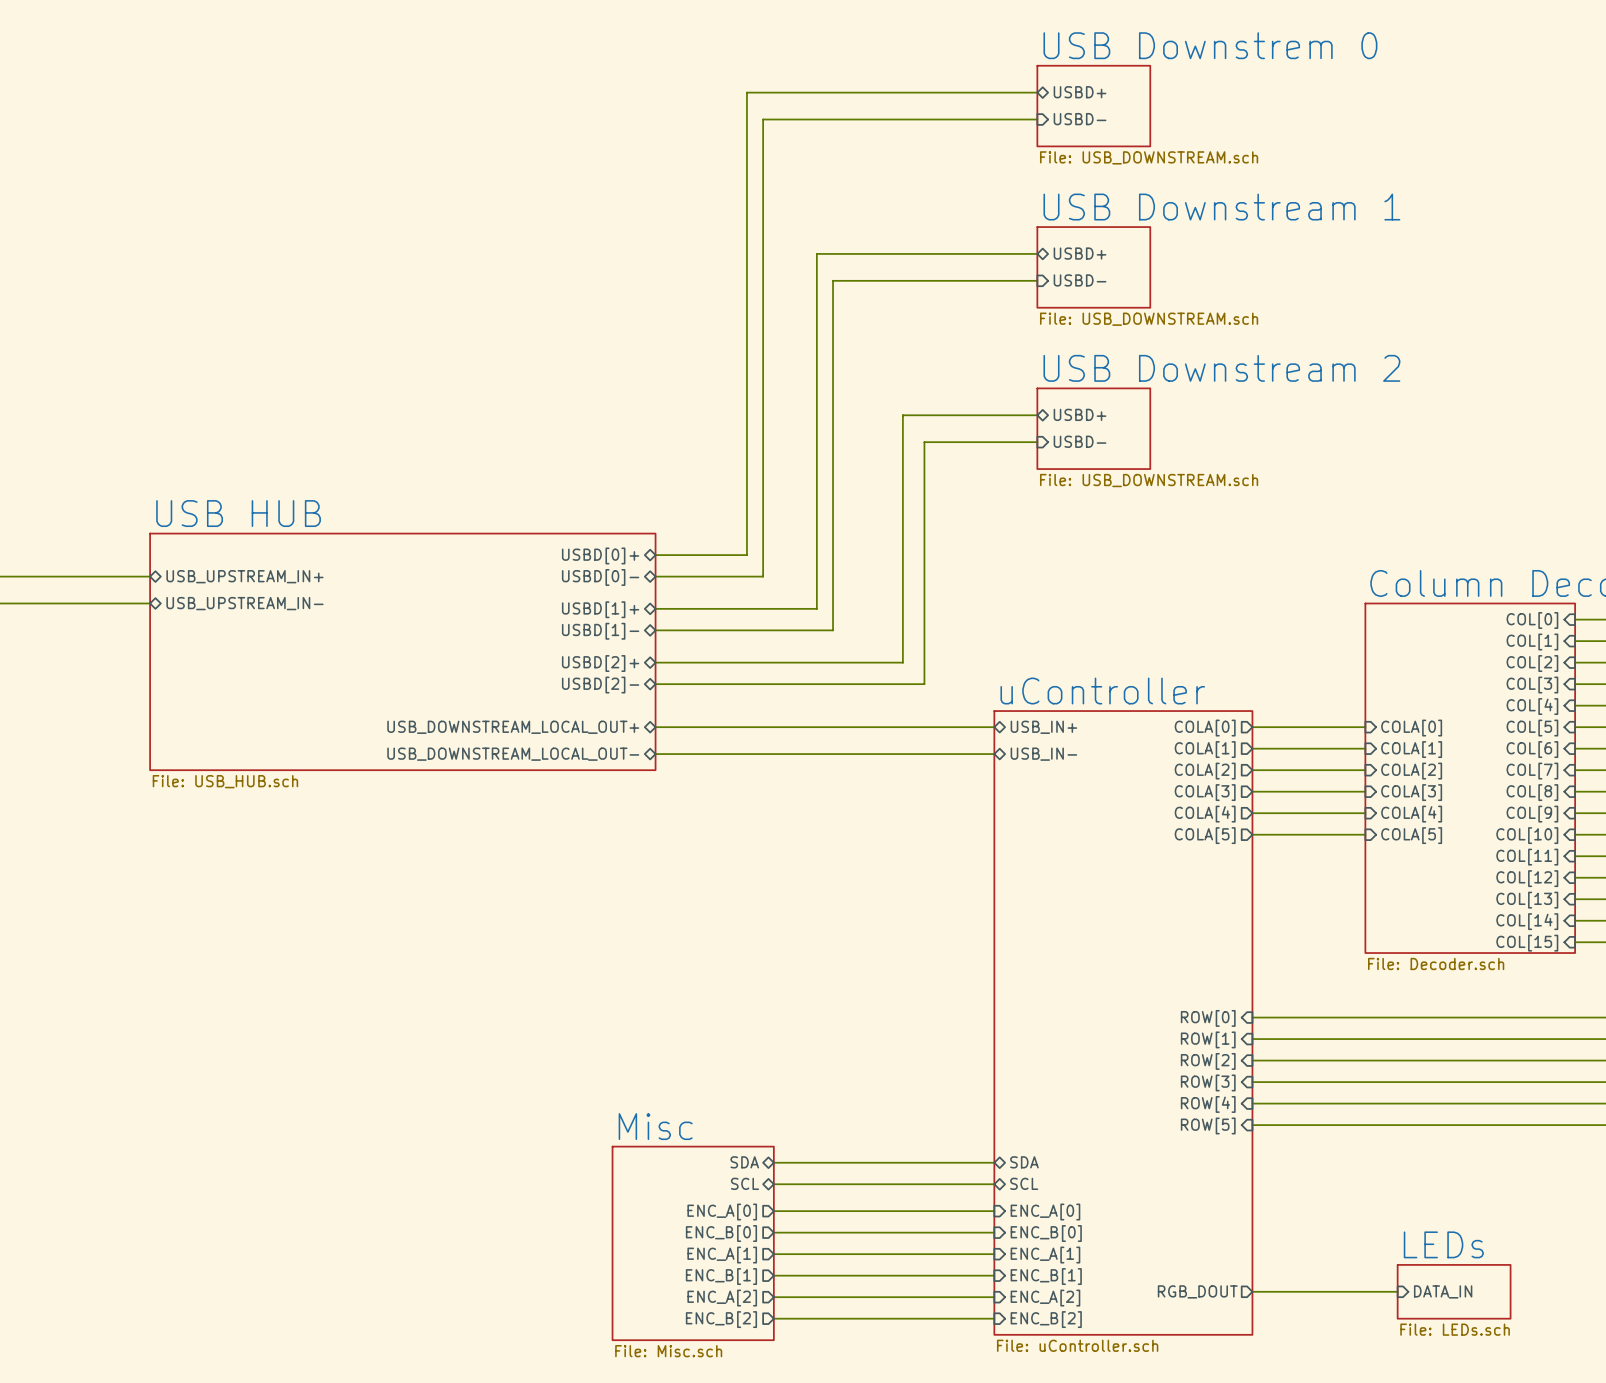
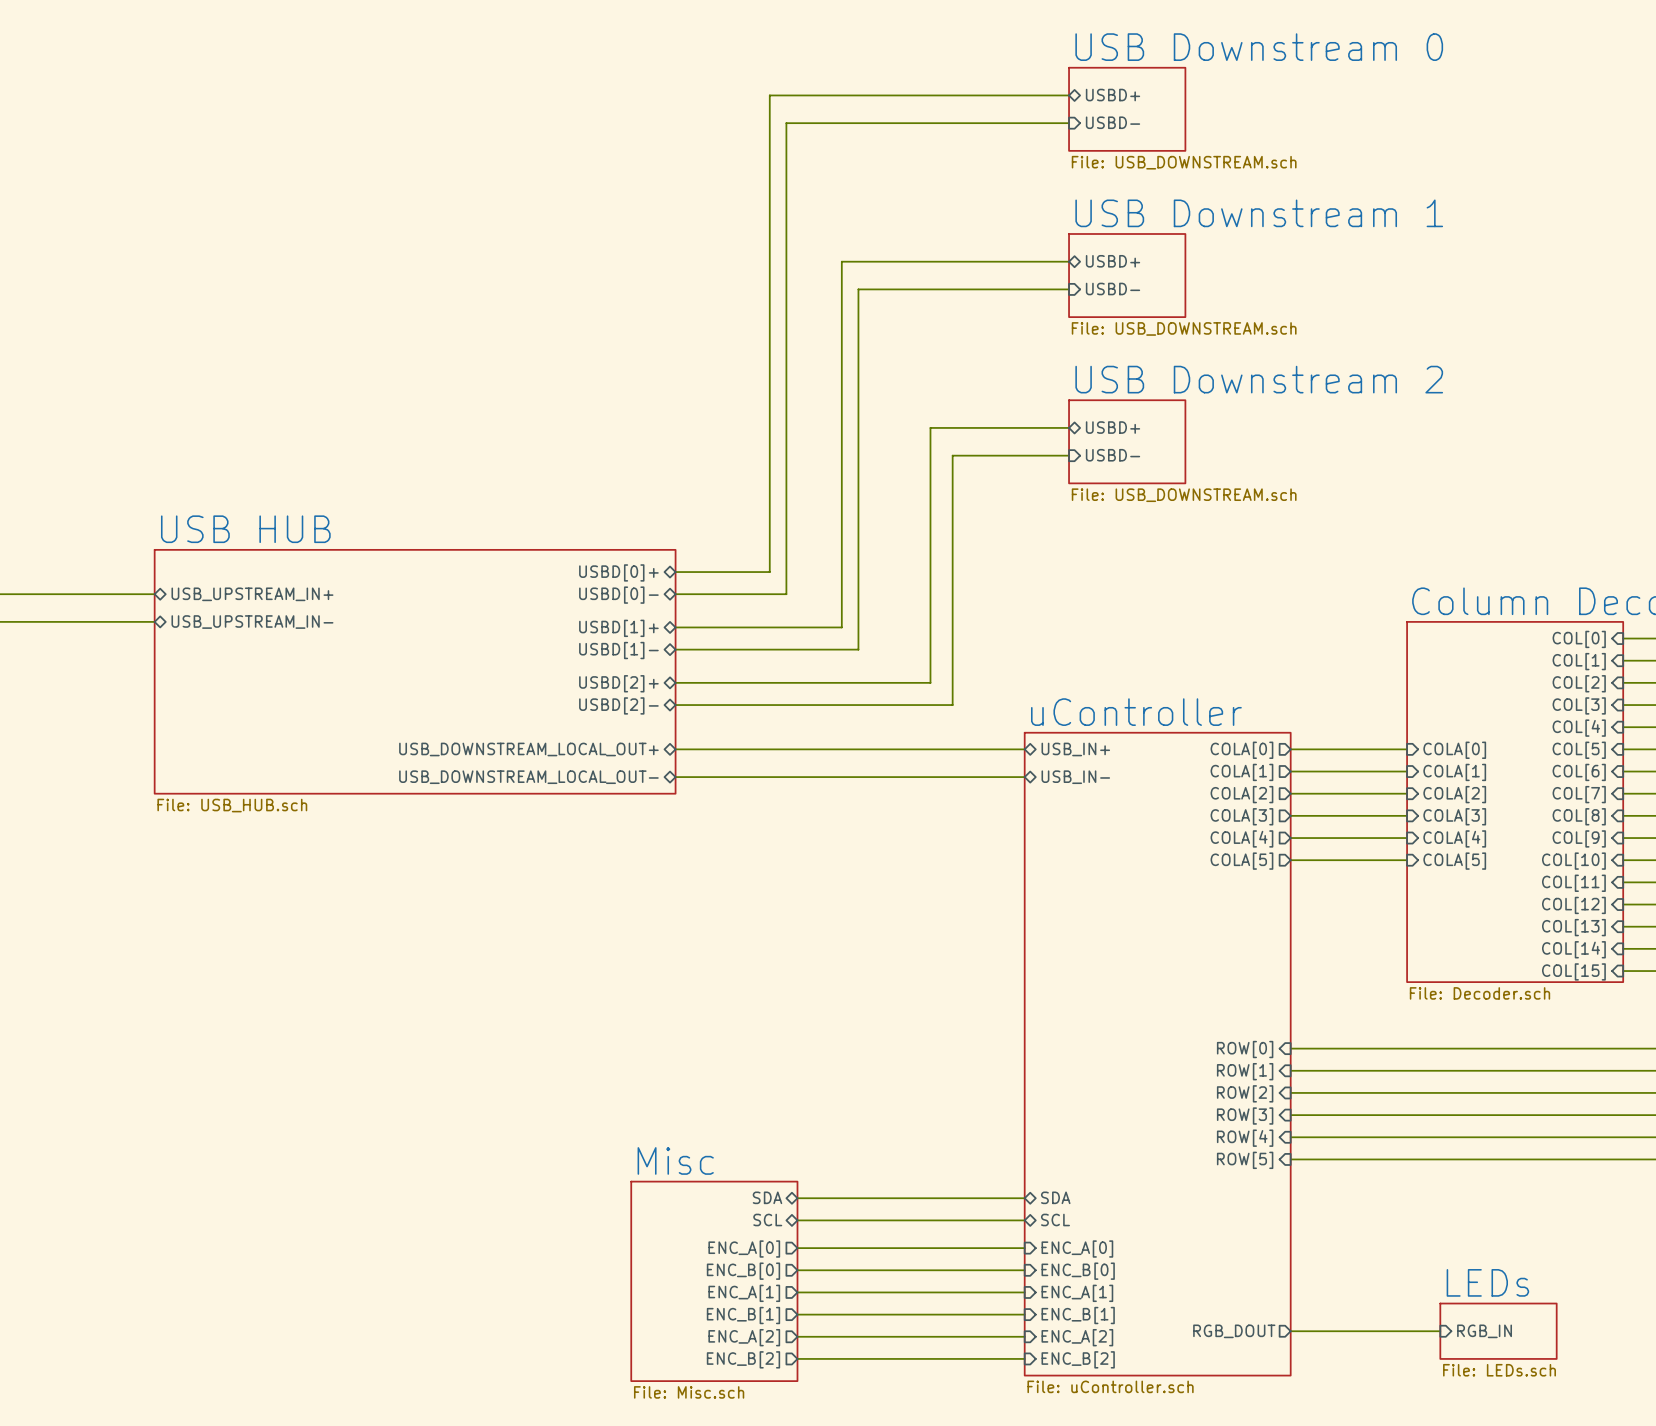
sheet USB Downstrem 0 name: USB Downstrem 0 (1210, 45) -> USB Downstream 0 (1259, 47)
sheet pin: DATA_IN (1443, 1291) -> RGB_IN (1484, 1331)

